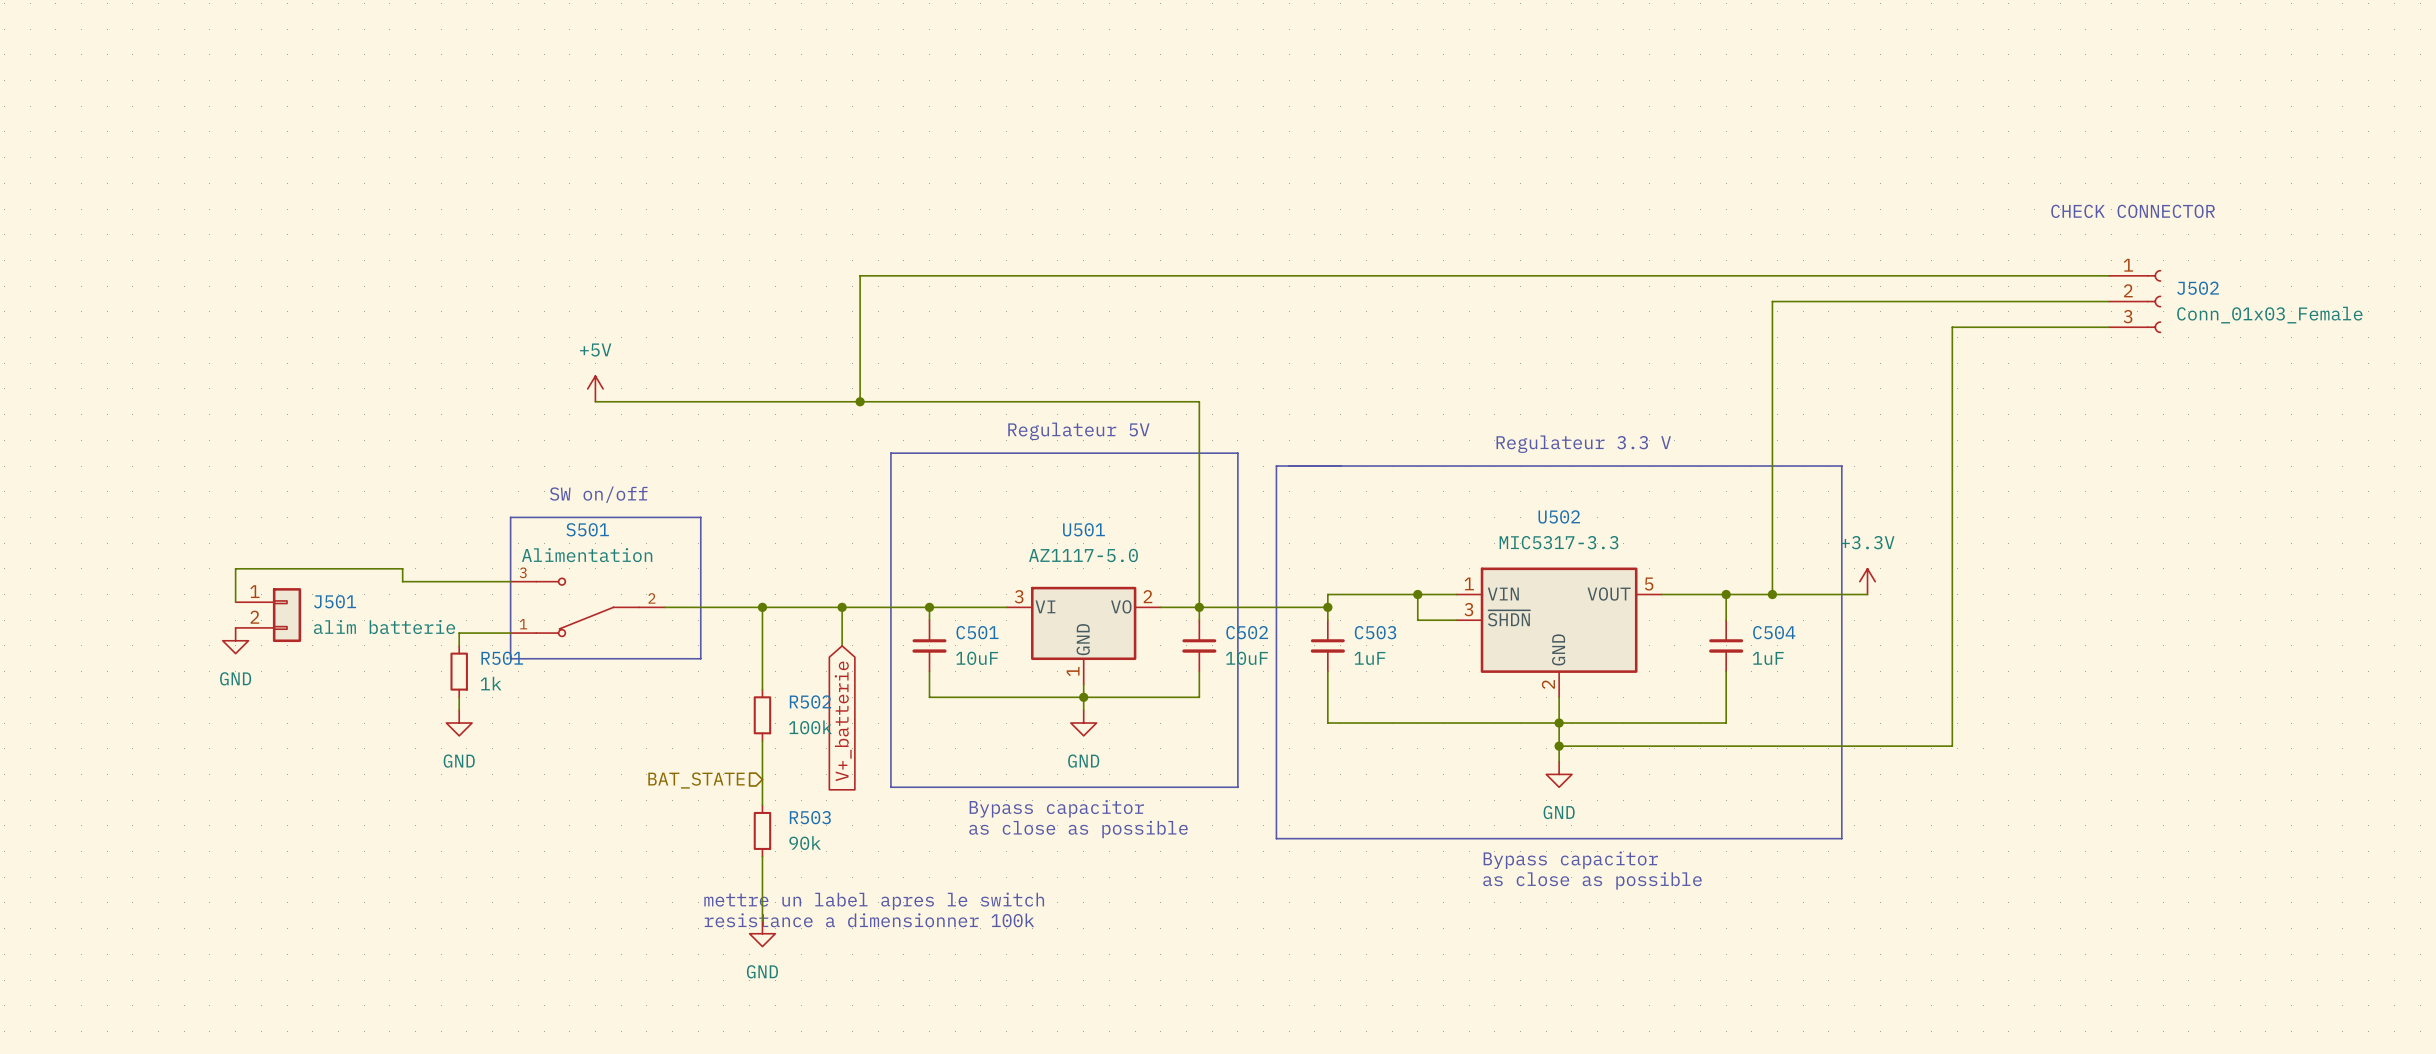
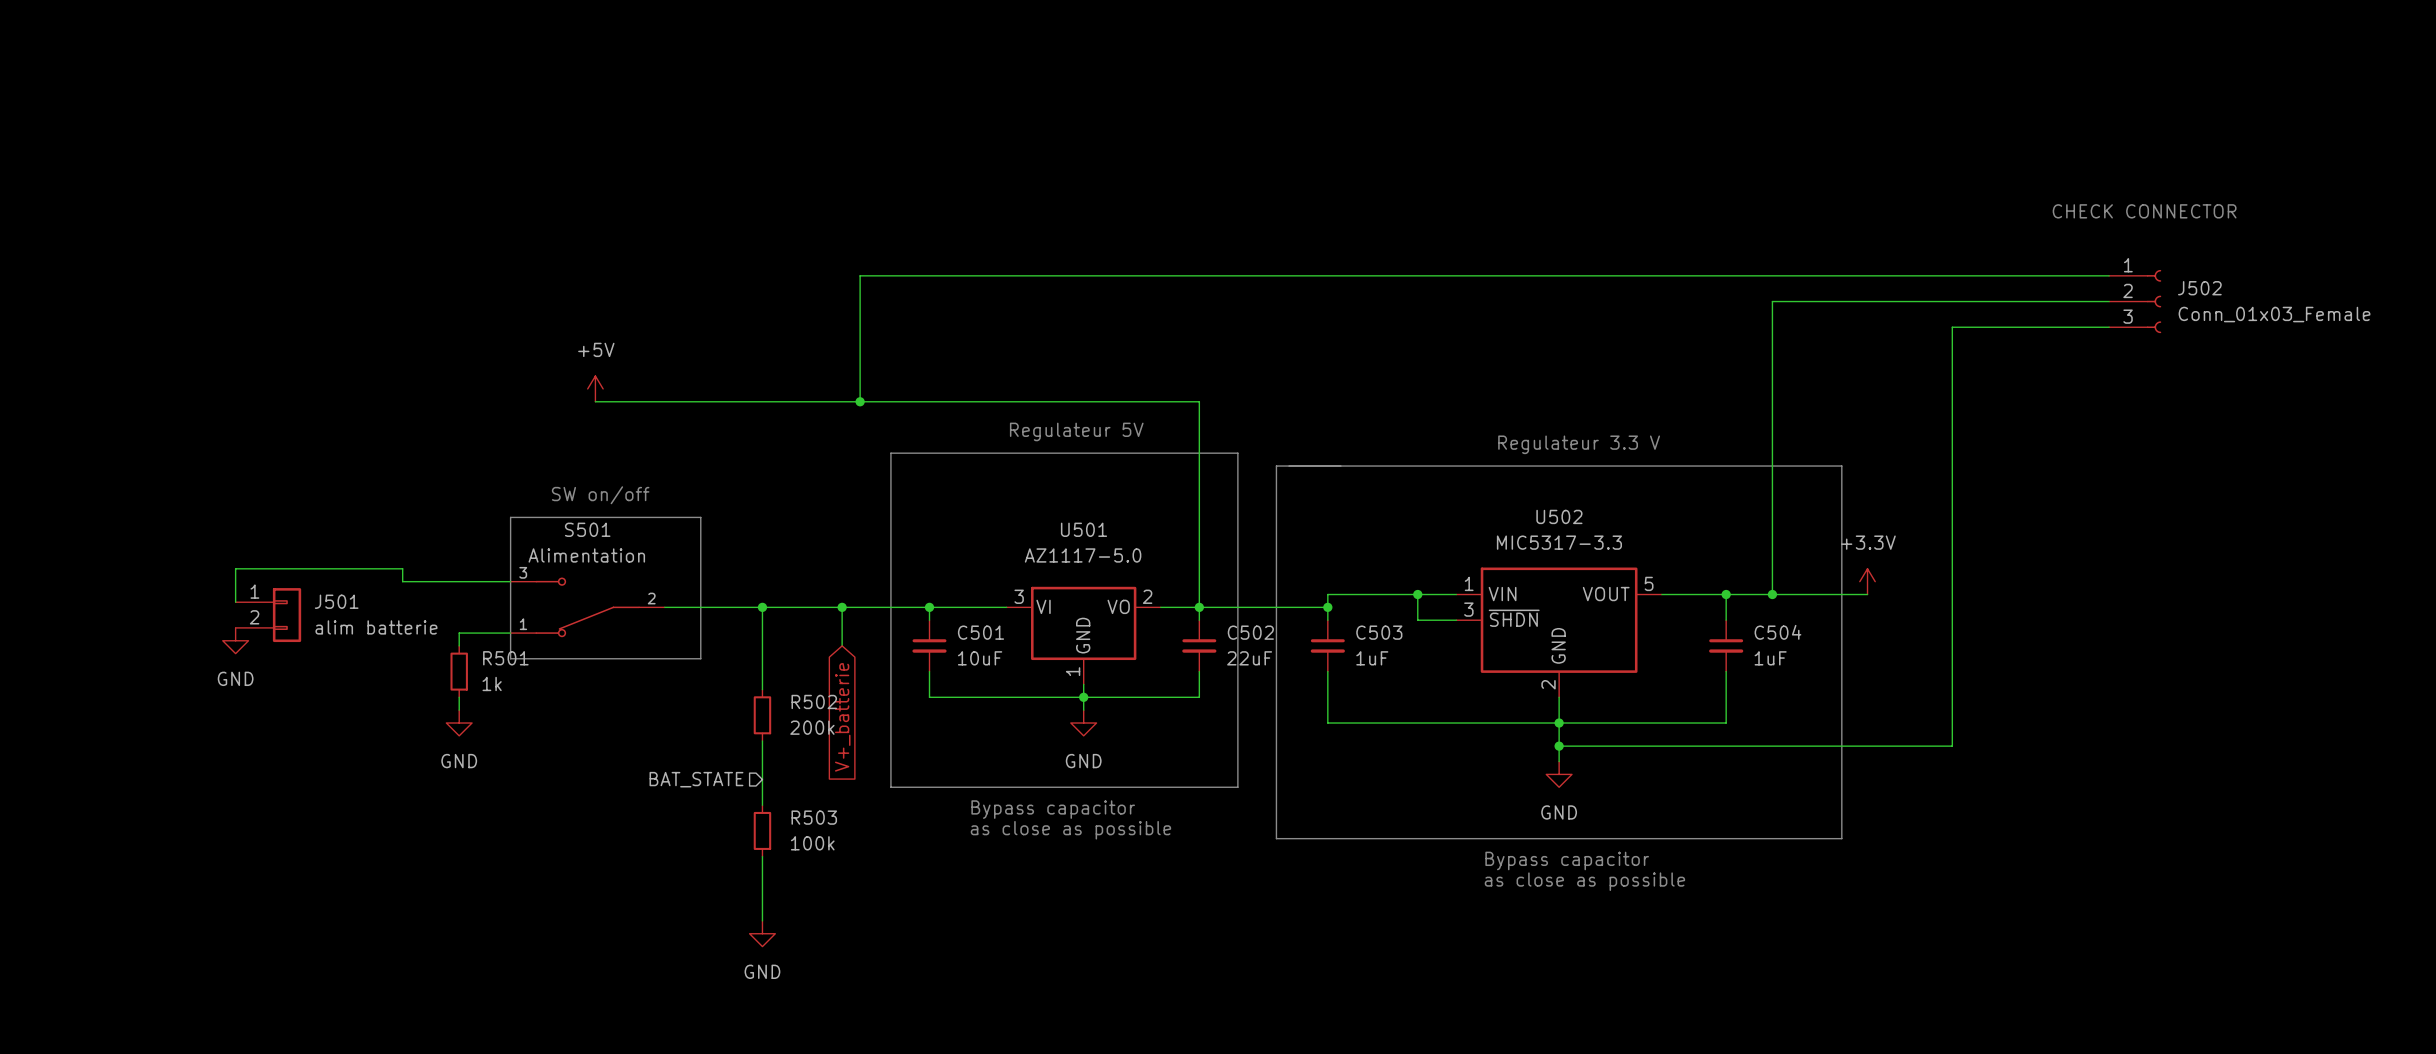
C502 value: 10uF (1246, 658) -> 22uF (1249, 658)
R502 value: 100k (810, 727) -> 200k (812, 727)
R503 value: 90k (805, 843) -> 100k (812, 843)
text: mettre un label apres le switch (874, 901) -> none
text: resistance a dimensionner 100k (869, 920) -> none

